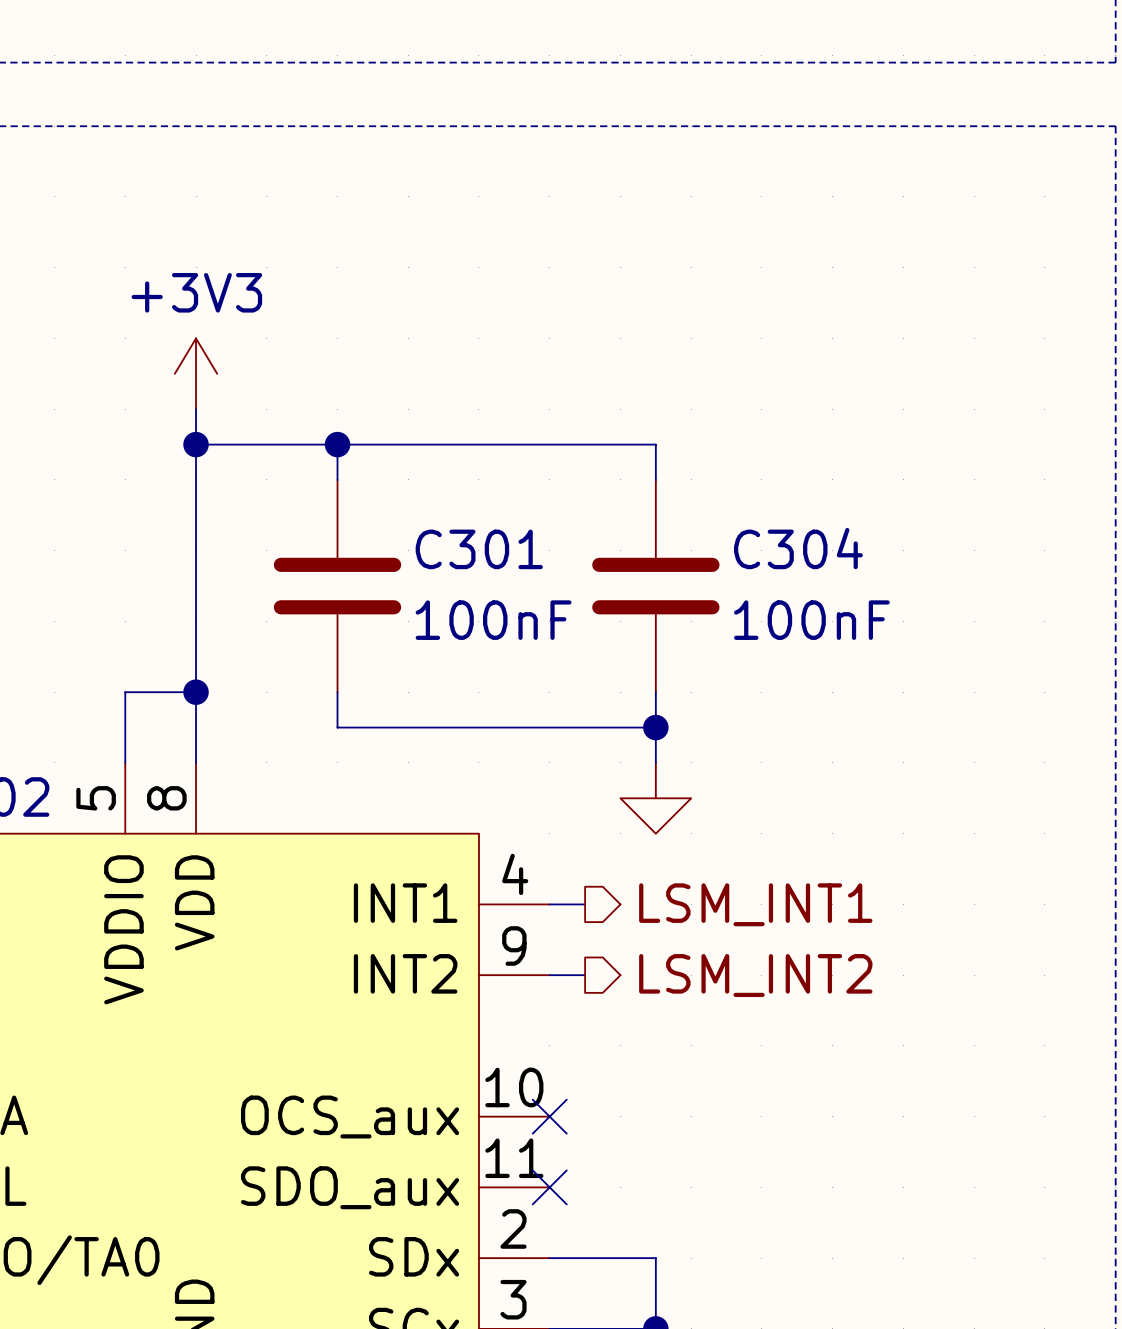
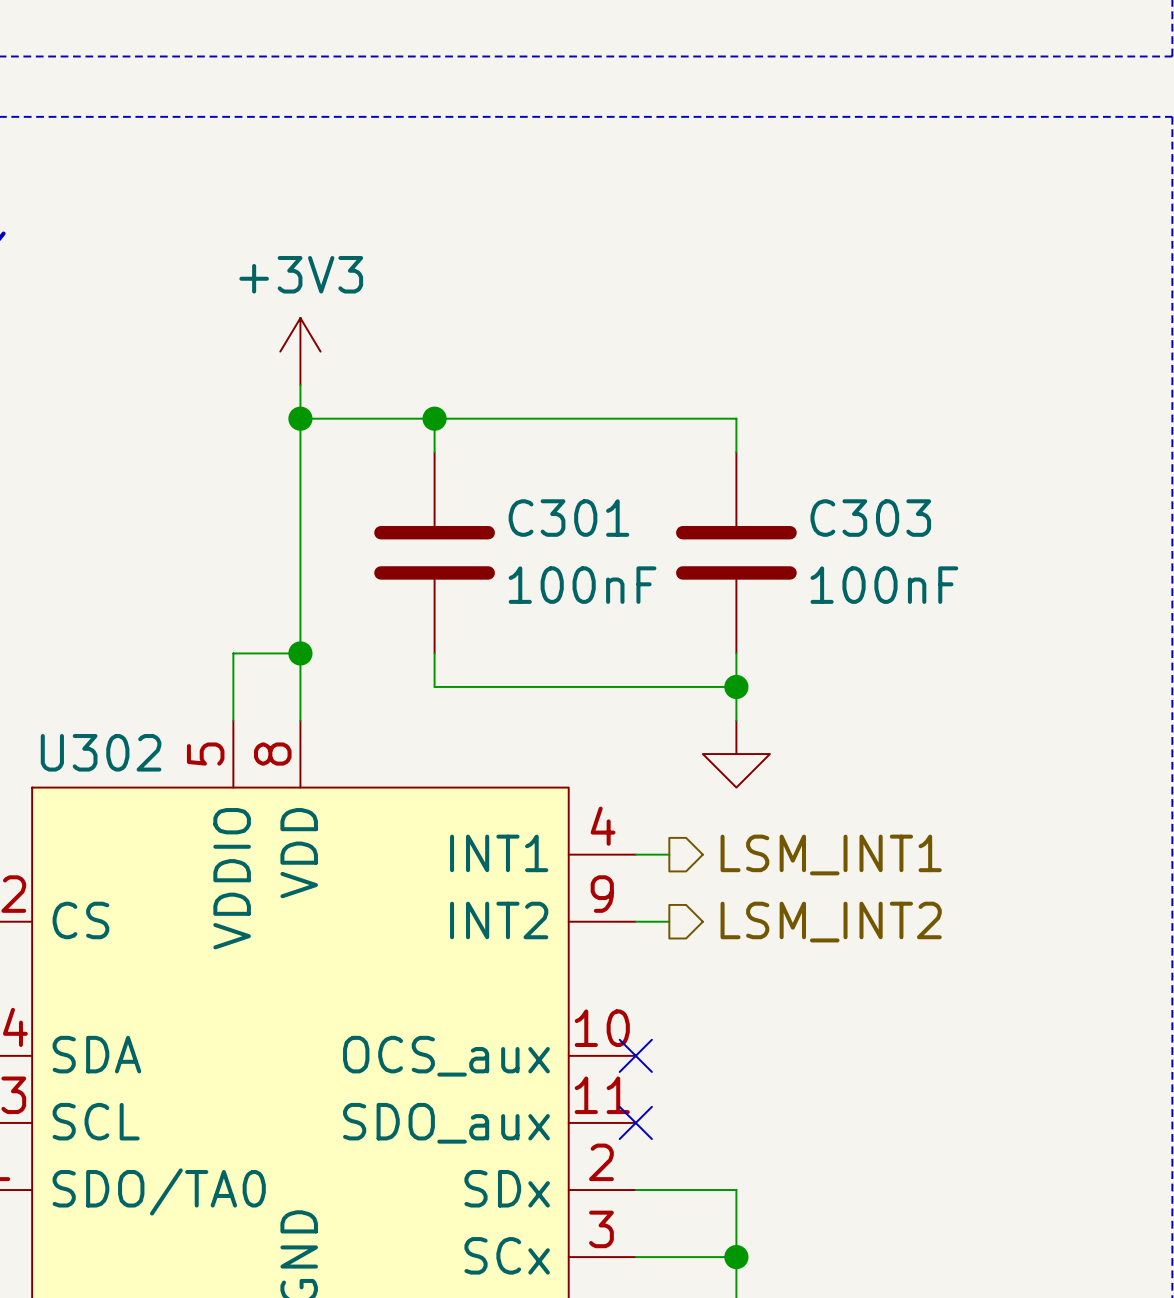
C304 name: C304 (798, 548) -> C303 (870, 518)

